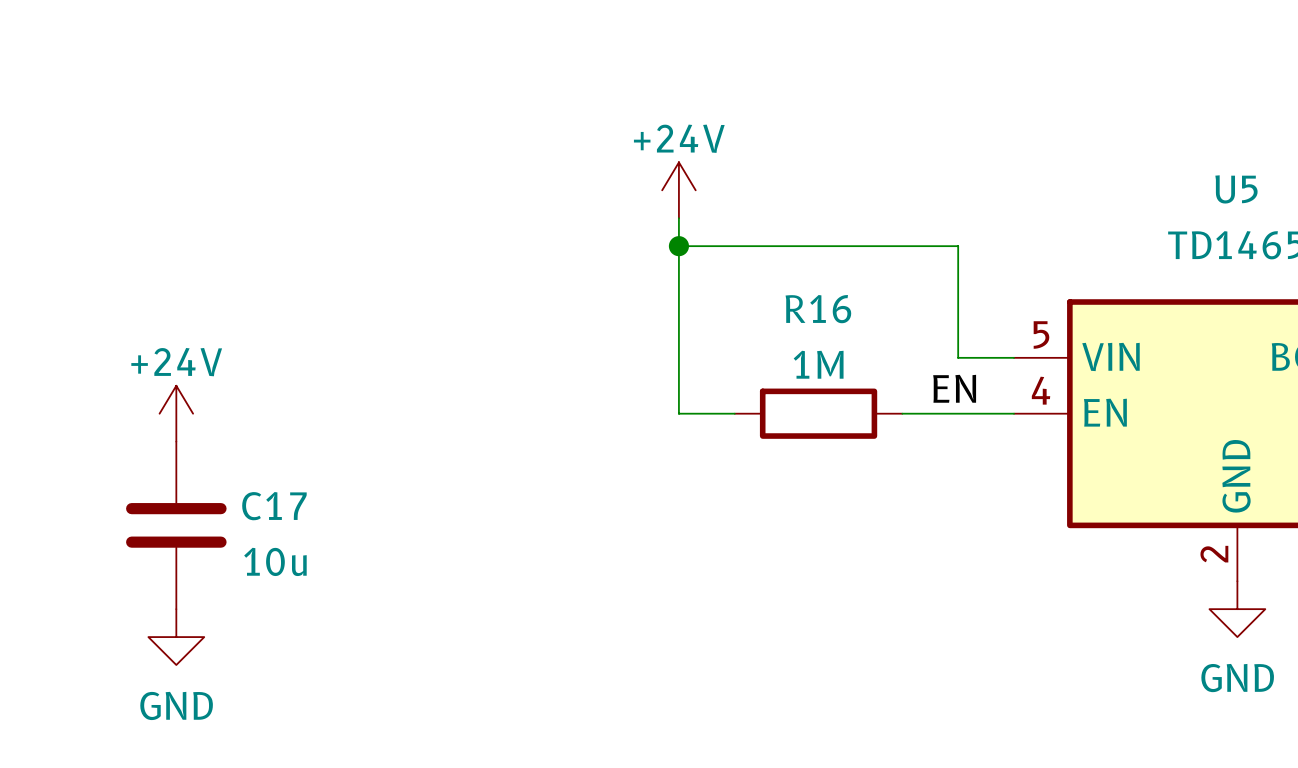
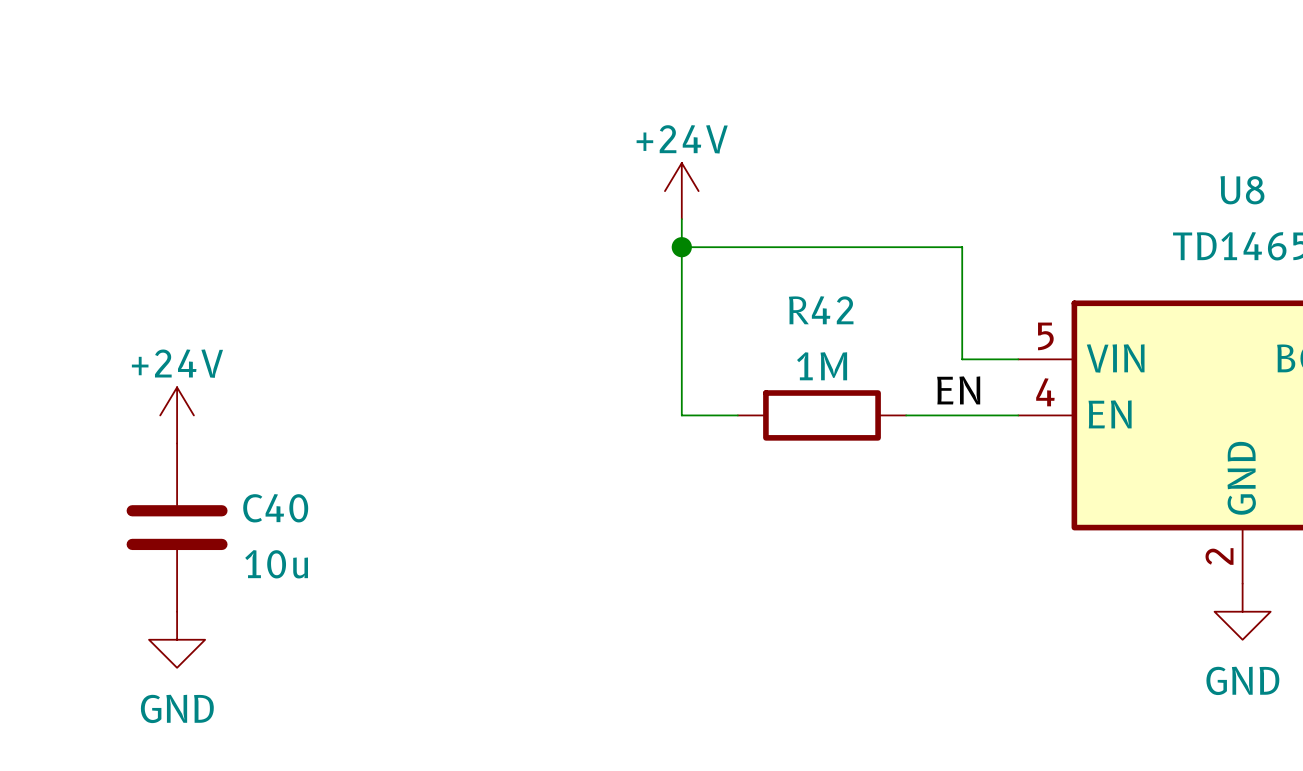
U5 name: U5 (1236, 189) -> U8 (1242, 190)
R16 name: R16 (818, 309) -> R42 (821, 310)
C17 name: C17 (274, 506) -> C40 (275, 508)

